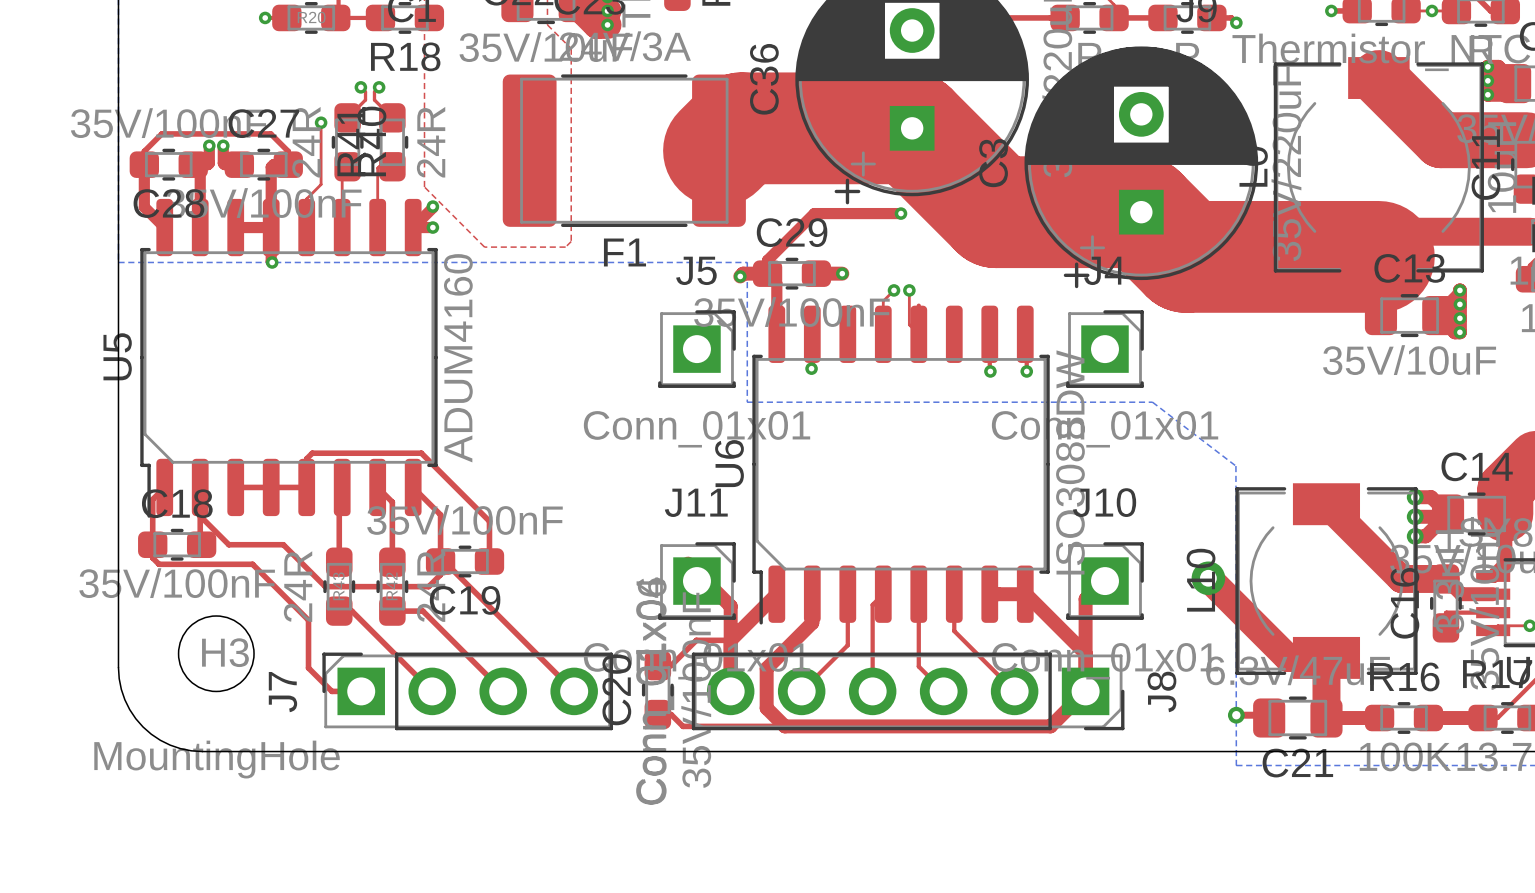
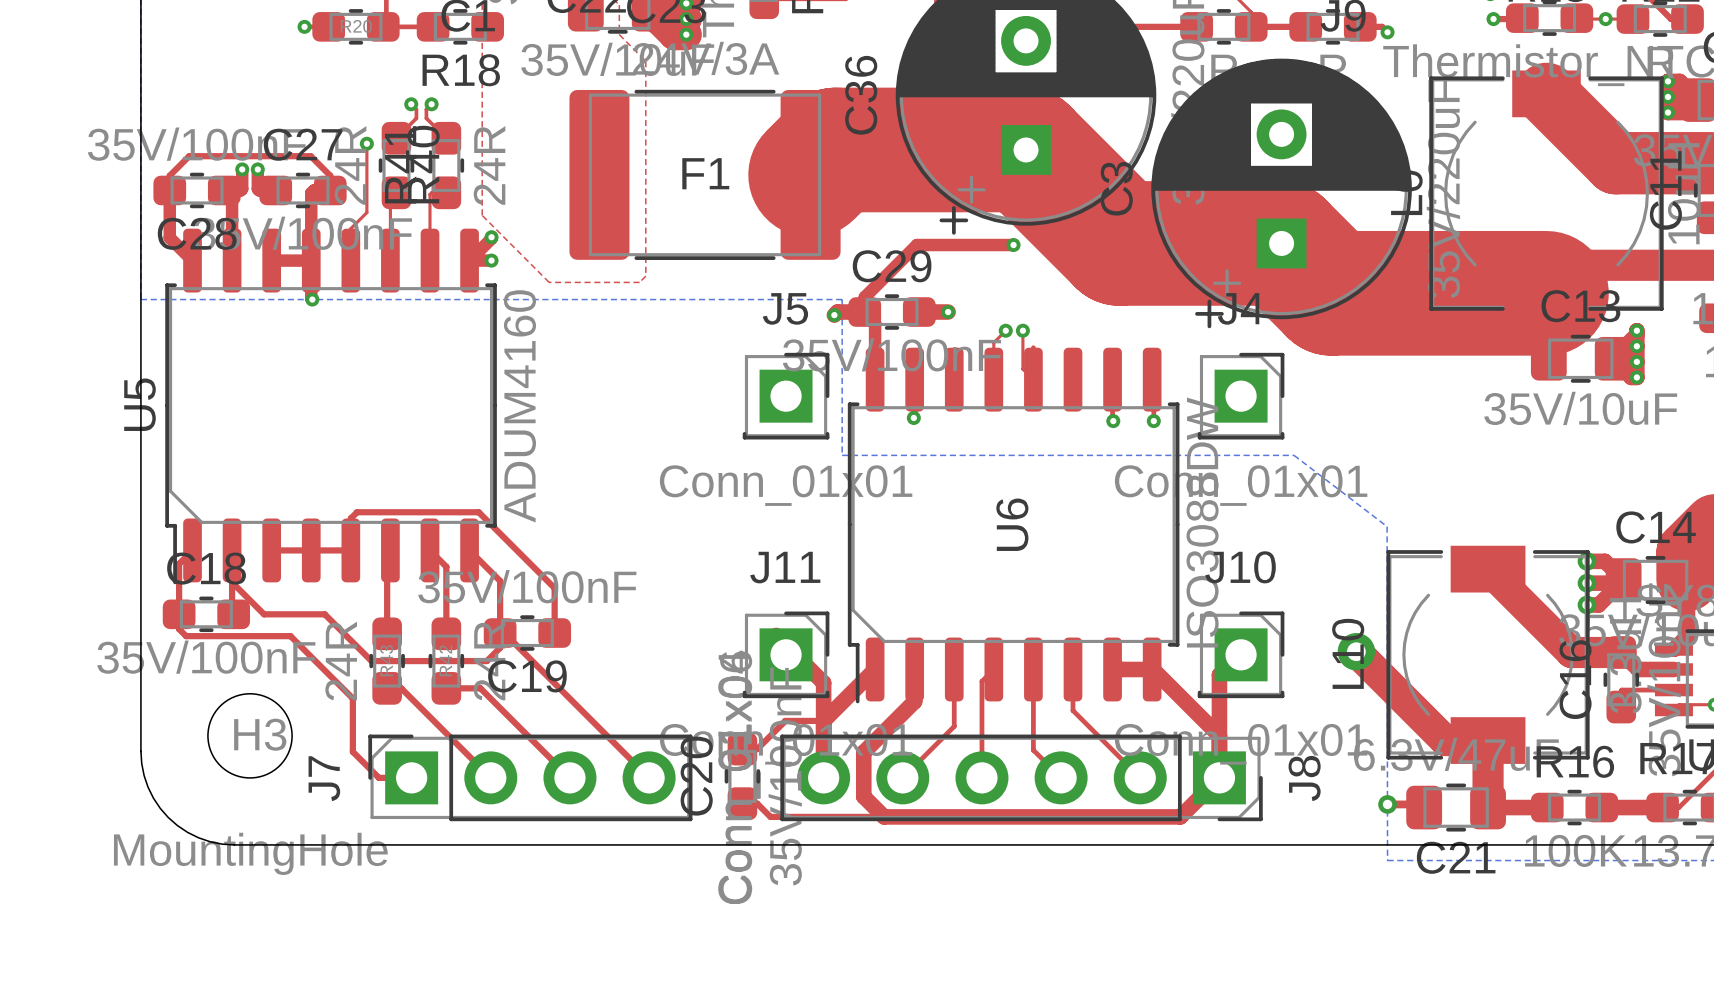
F1 name position: F1 (624, 252) -> F1 (705, 173)
U6 name position: U6 (729, 463) -> U6 (1012, 524)

